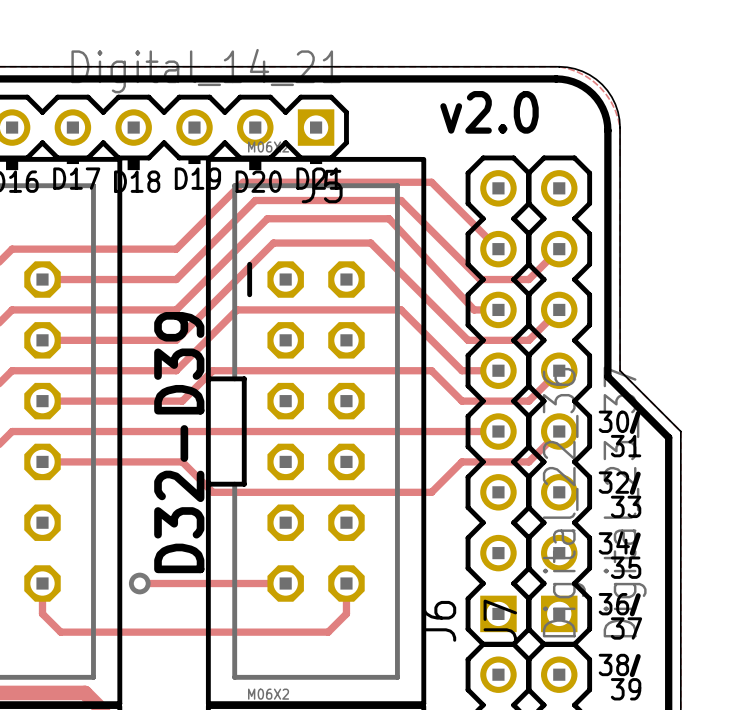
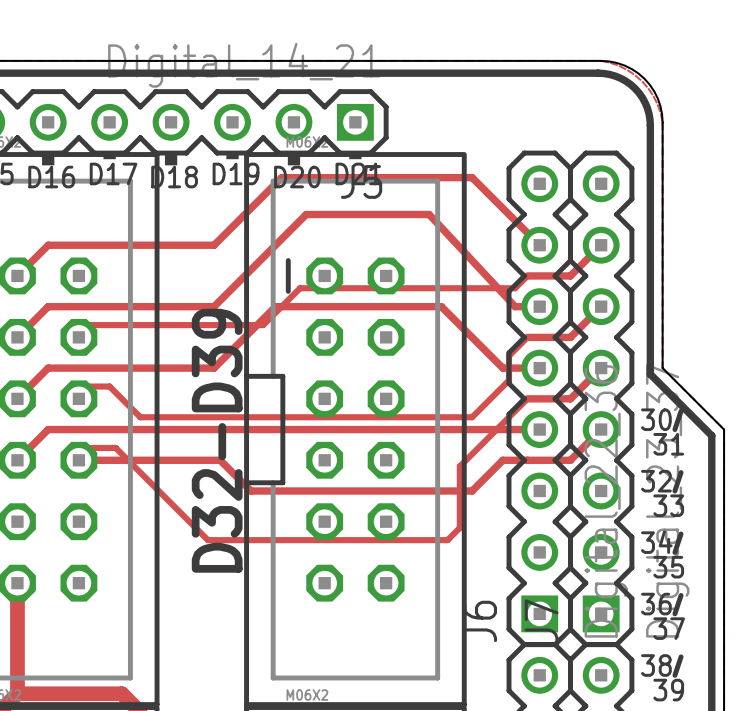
text: v2.0 (489, 112) -> none
track: (42, 279) (176, 279) (255, 200) (401, 200) (480, 279) (486, 279) -> (78, 325) (263, 325) (300, 288) (515, 288) (527, 275)
track: (42, 340) (176, 340) (273, 243) (370, 243) (468, 340) (486, 340) -> (78, 386) (109, 386) (140, 417) (472, 417) (509, 380) (509, 355) (527, 337)
track: (42, 401) (182, 401) (212, 370) (431, 370) (461, 401) (486, 401) -> (78, 447) (115, 447) (207, 540) (447, 540) (459, 527) (459, 466) (527, 398)
track: (42, 583) (42, 613) (60, 632) (328, 632) (346, 613) (346, 583) -> none
track: (139, 583) (285, 583) -> none
via: (139, 583) -> none

